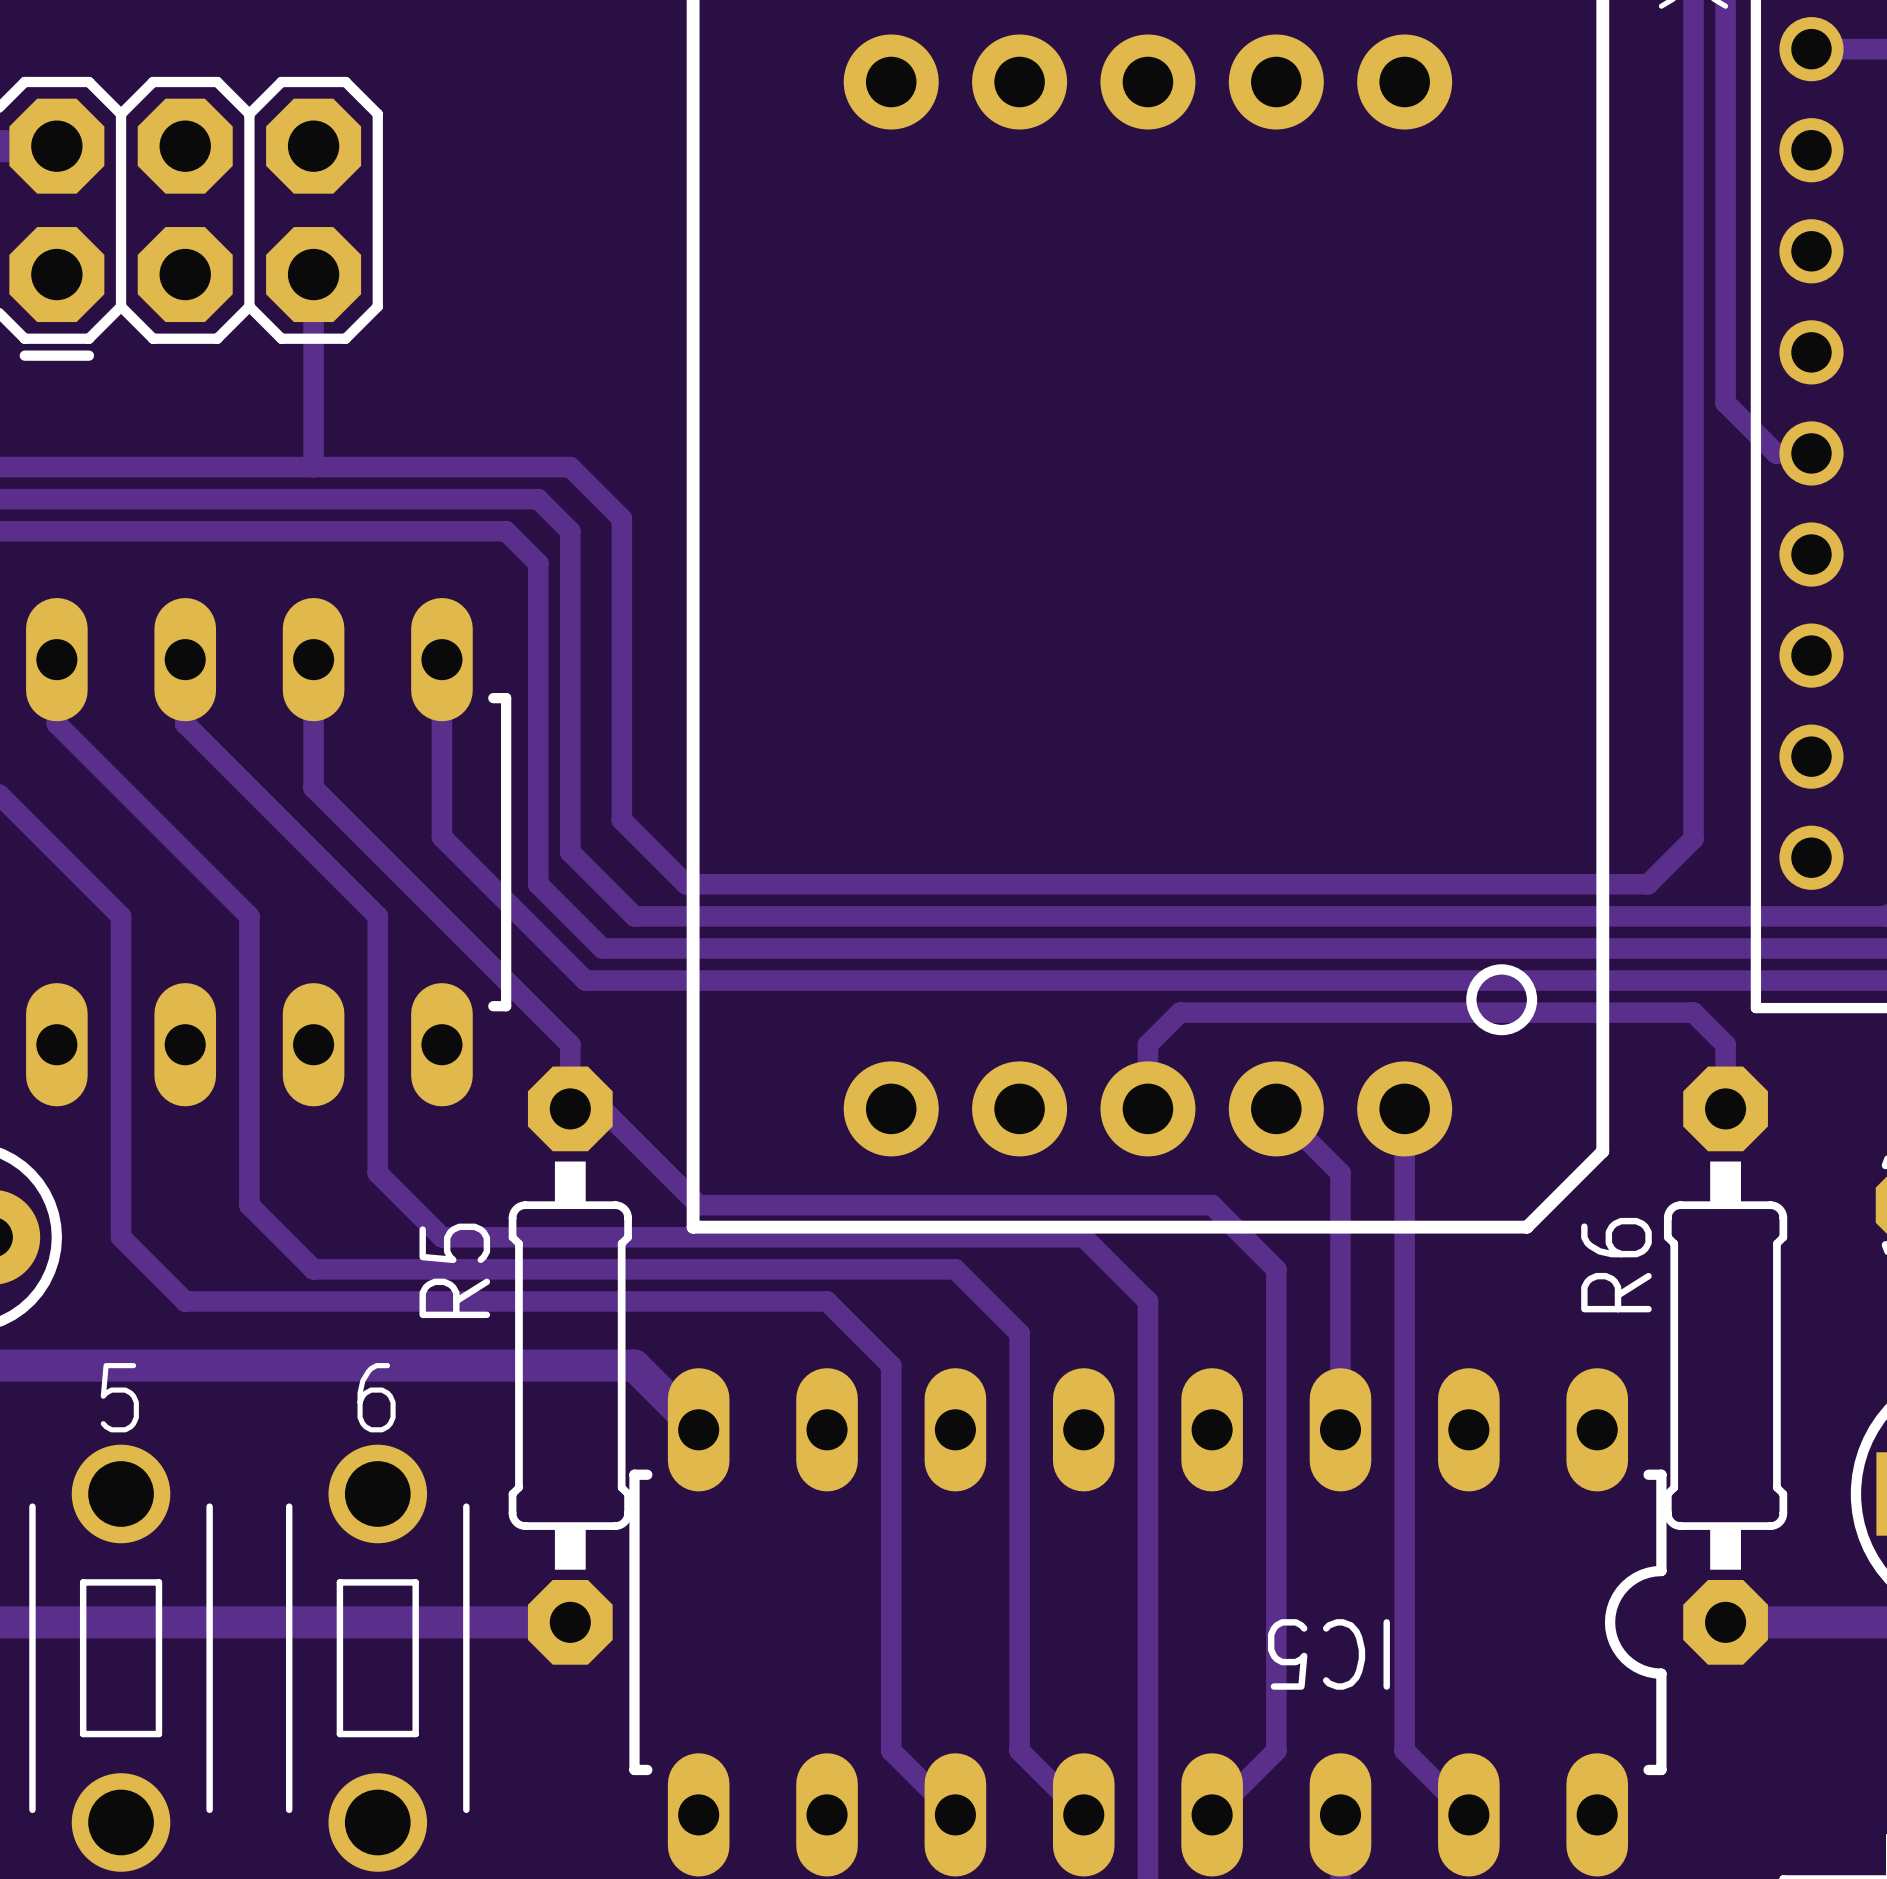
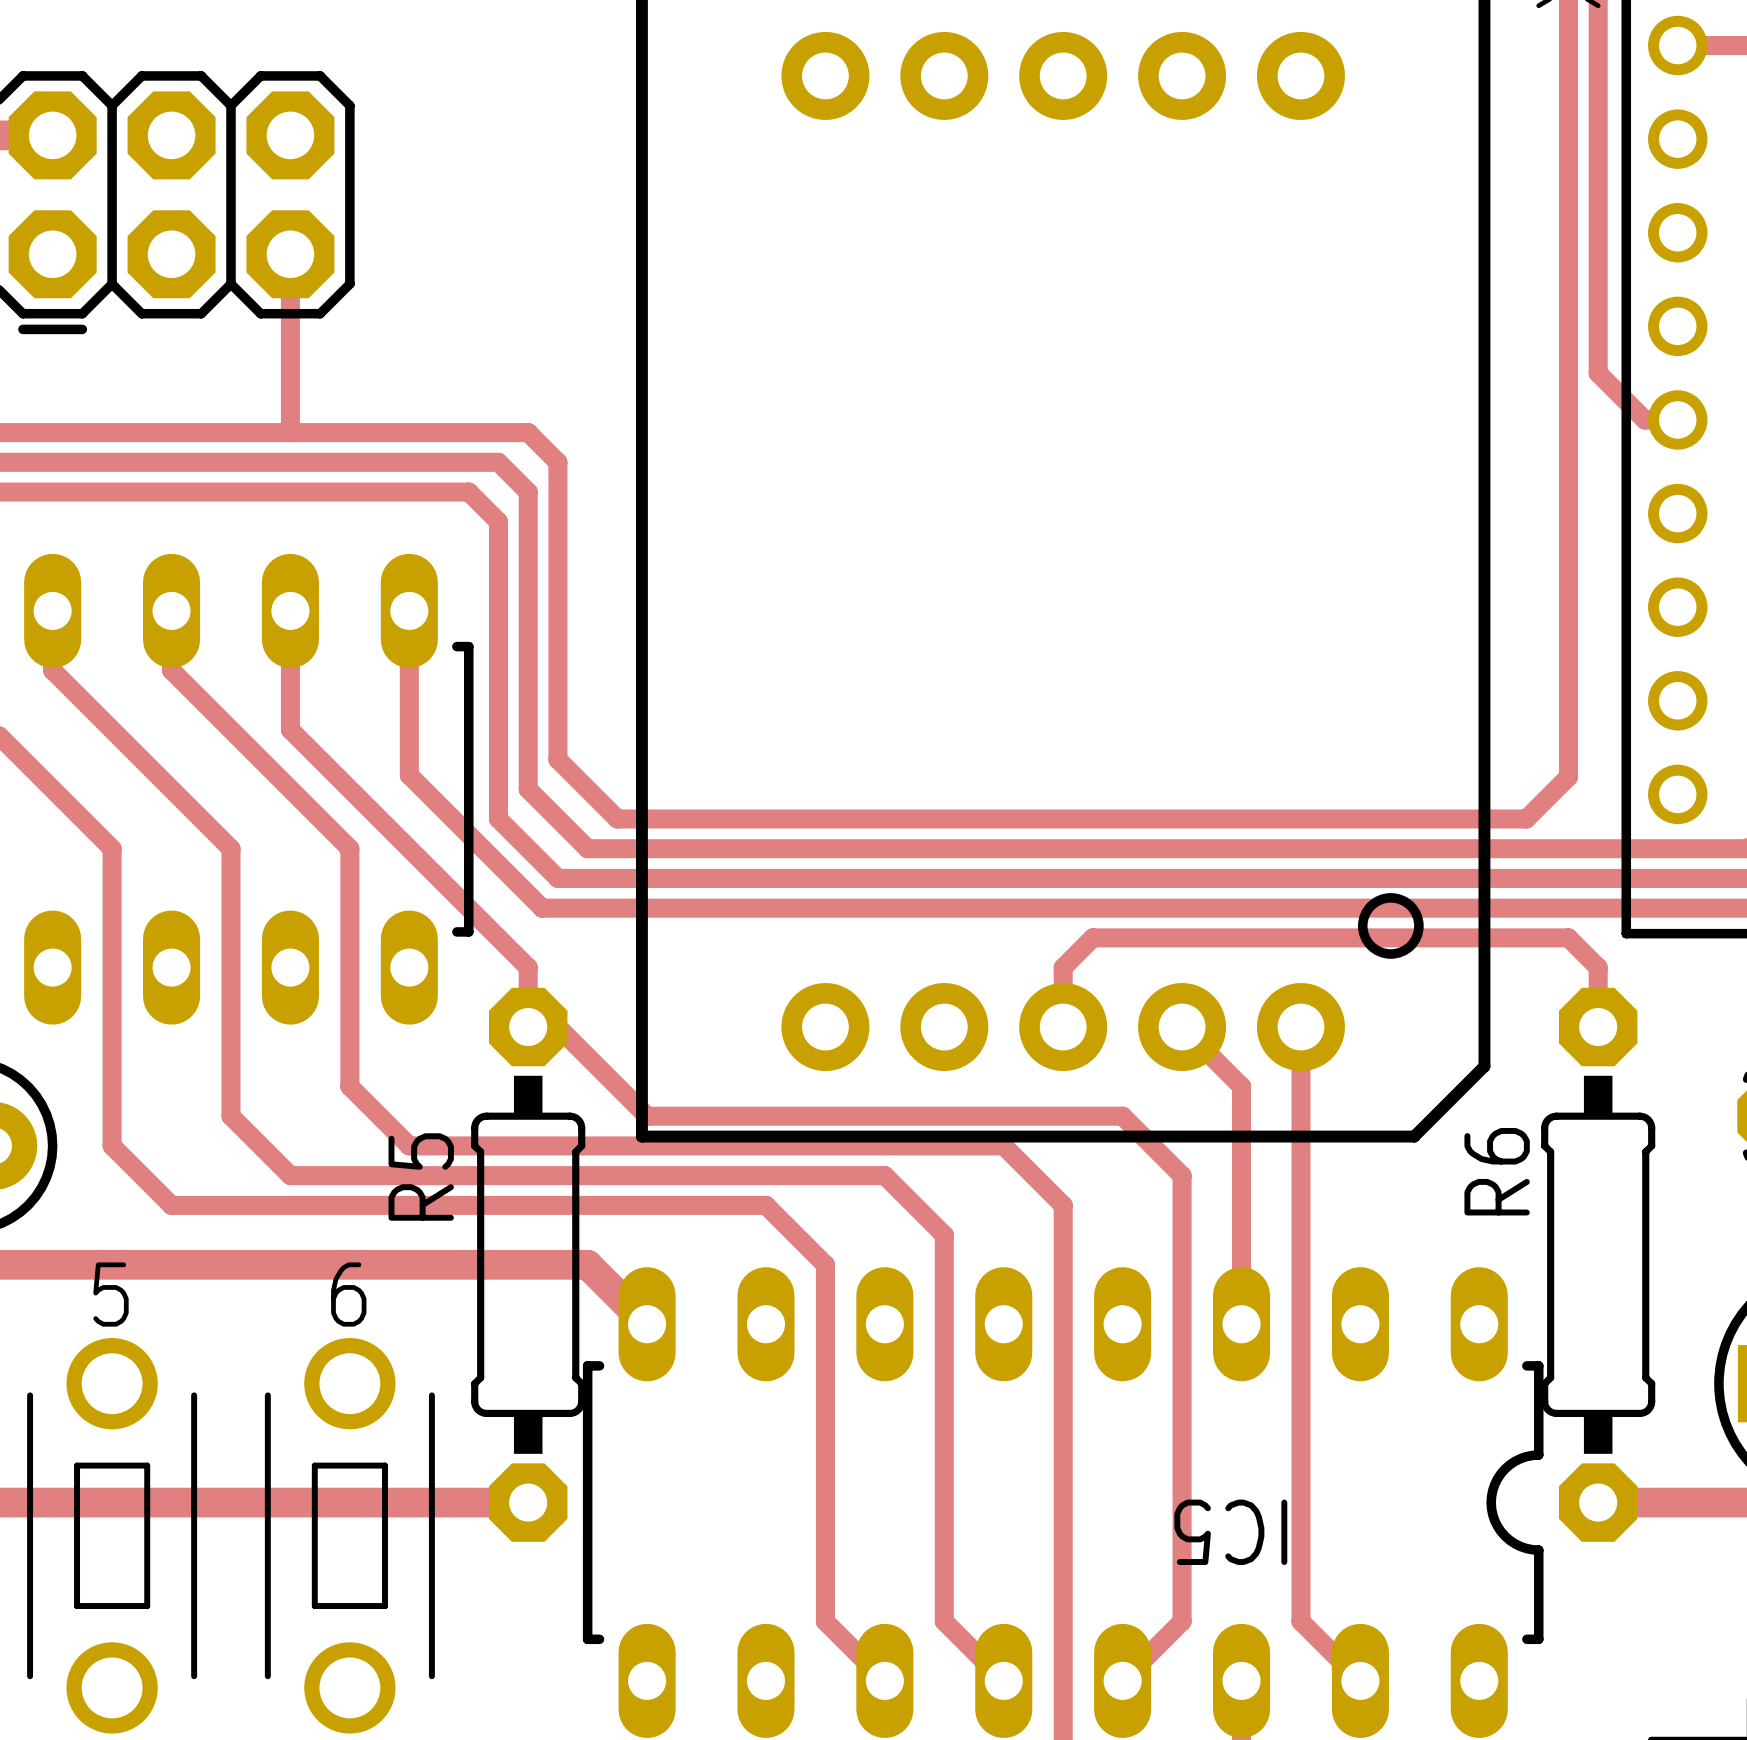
track: (602, 499) (621, 518) (621, 820) (686, 884) -> (557, 462) (557, 759) (617, 818) (635, 818)

